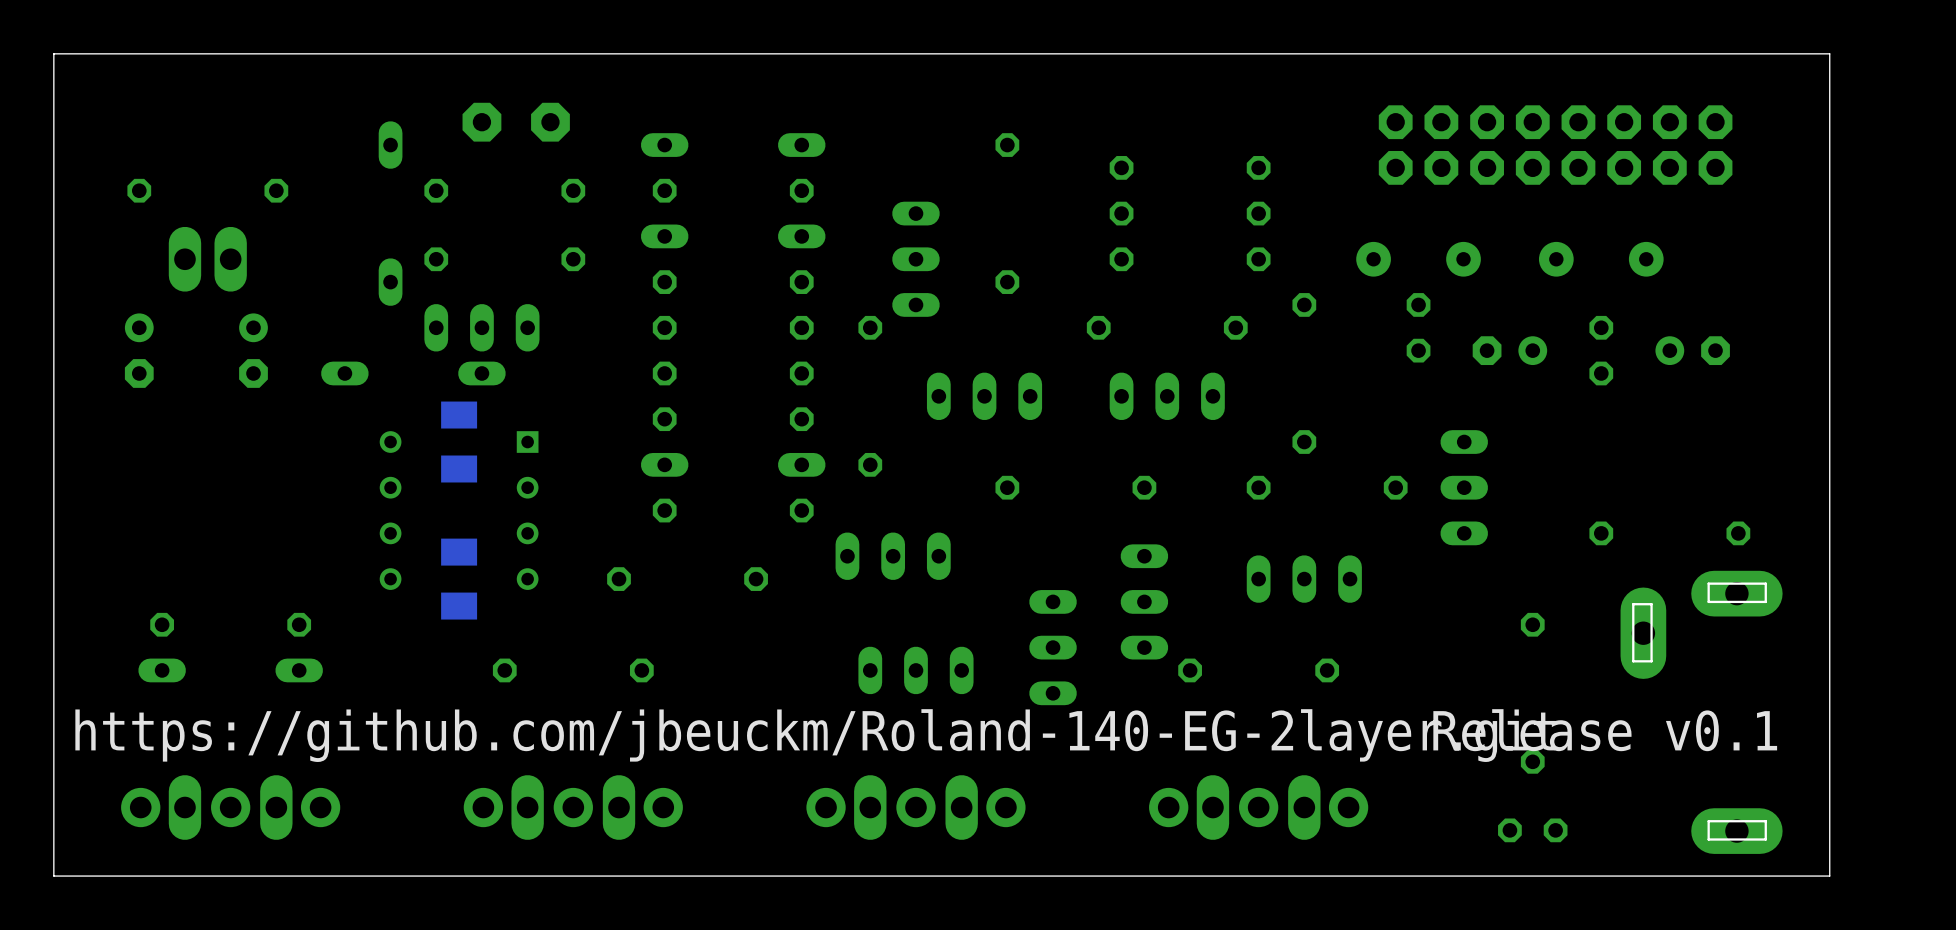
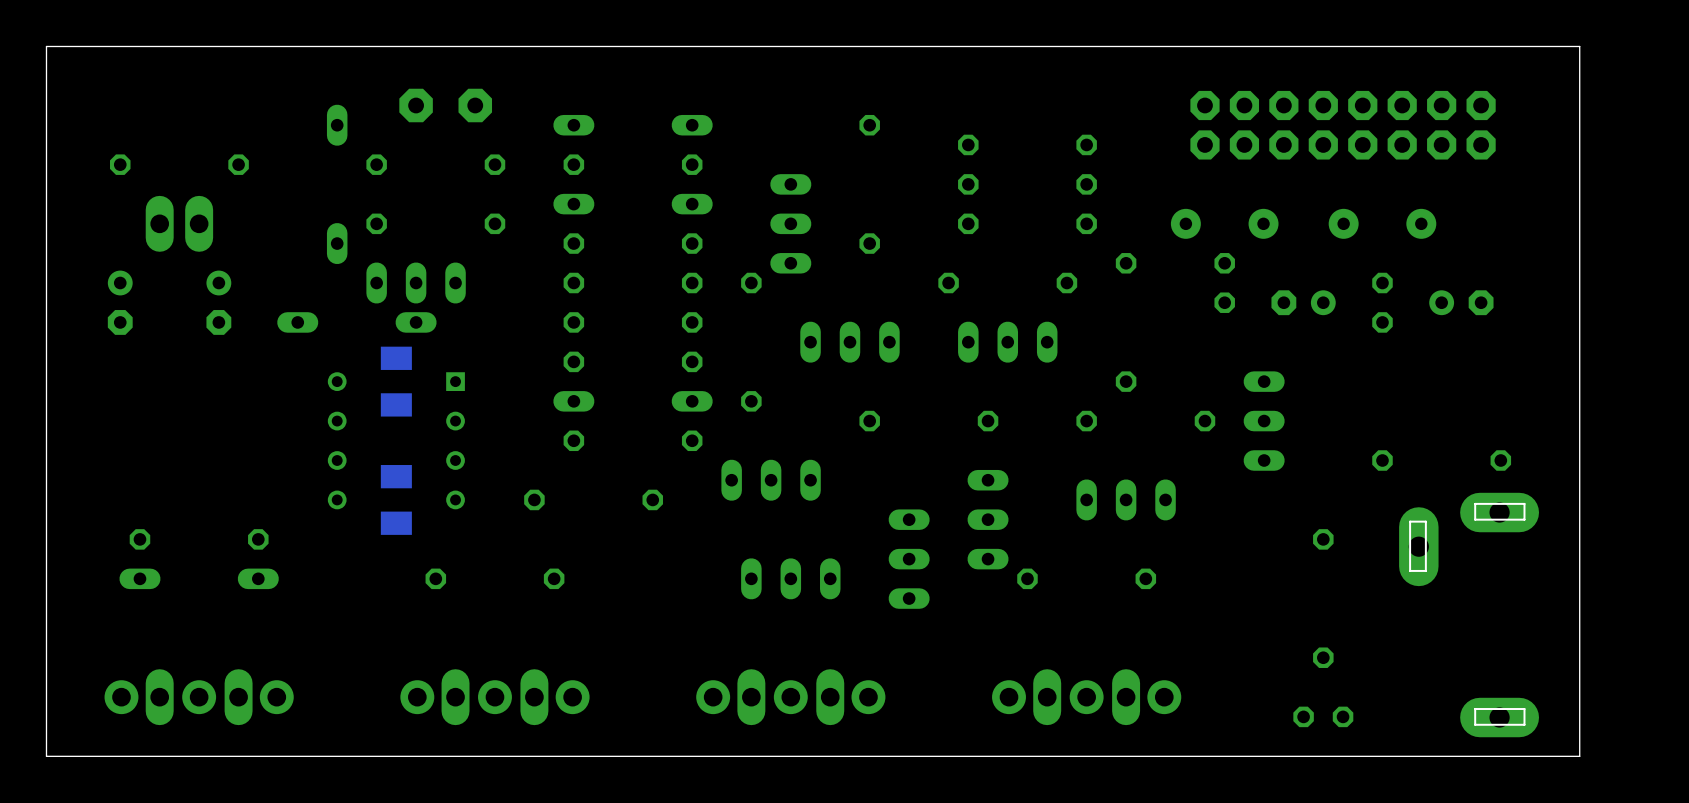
text: Release v0.1 (1605, 730) -> none
text: https://github.com/jbeuckm/Roland-140-EG-2layer.git (815, 735) -> none

